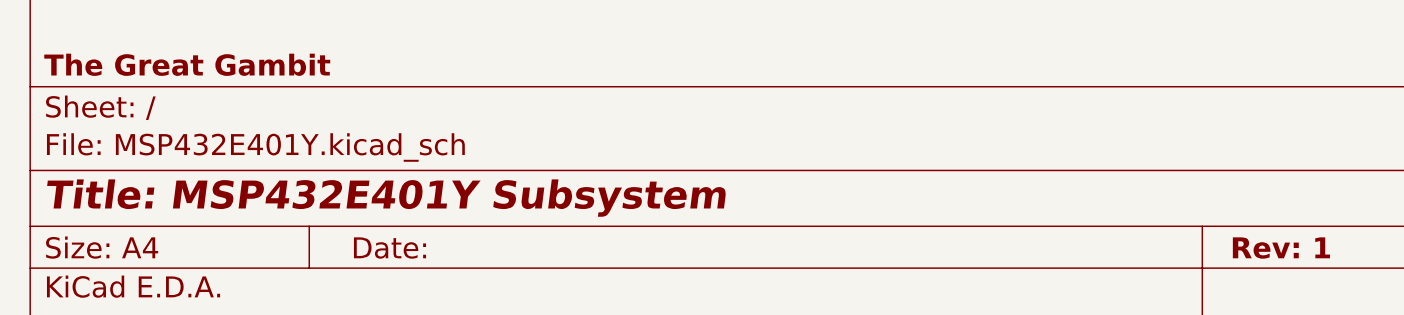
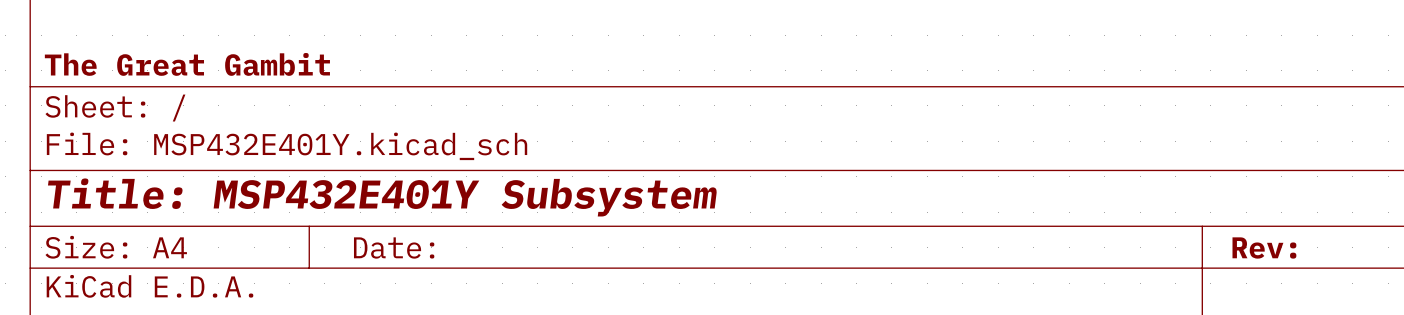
title block: Rev: 1 (1281, 248) -> Rev: (1264, 248)

